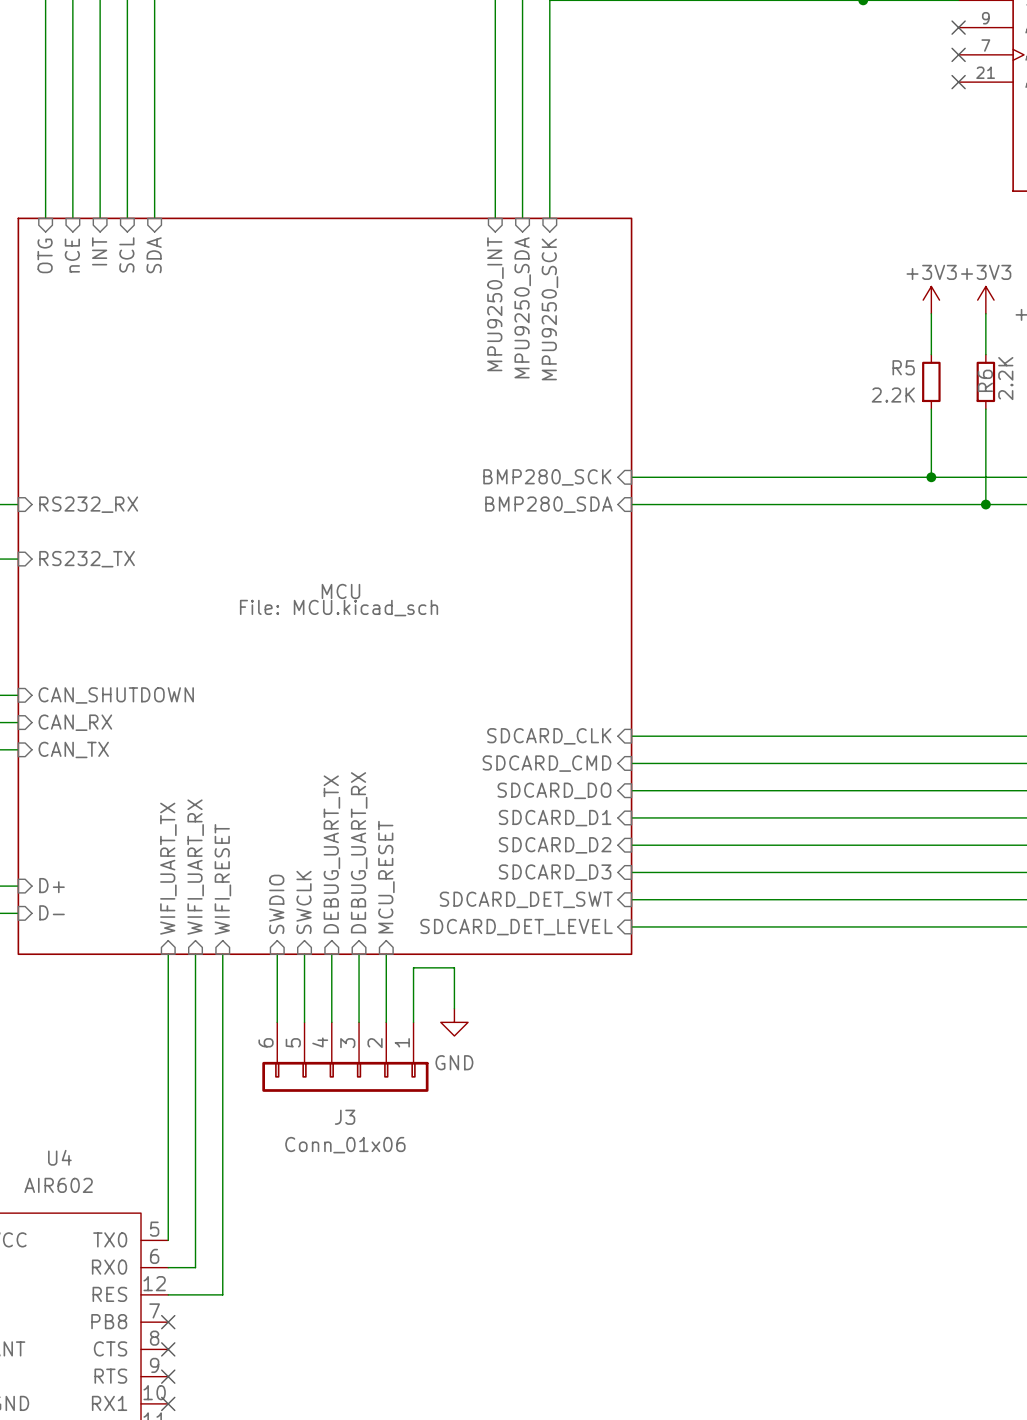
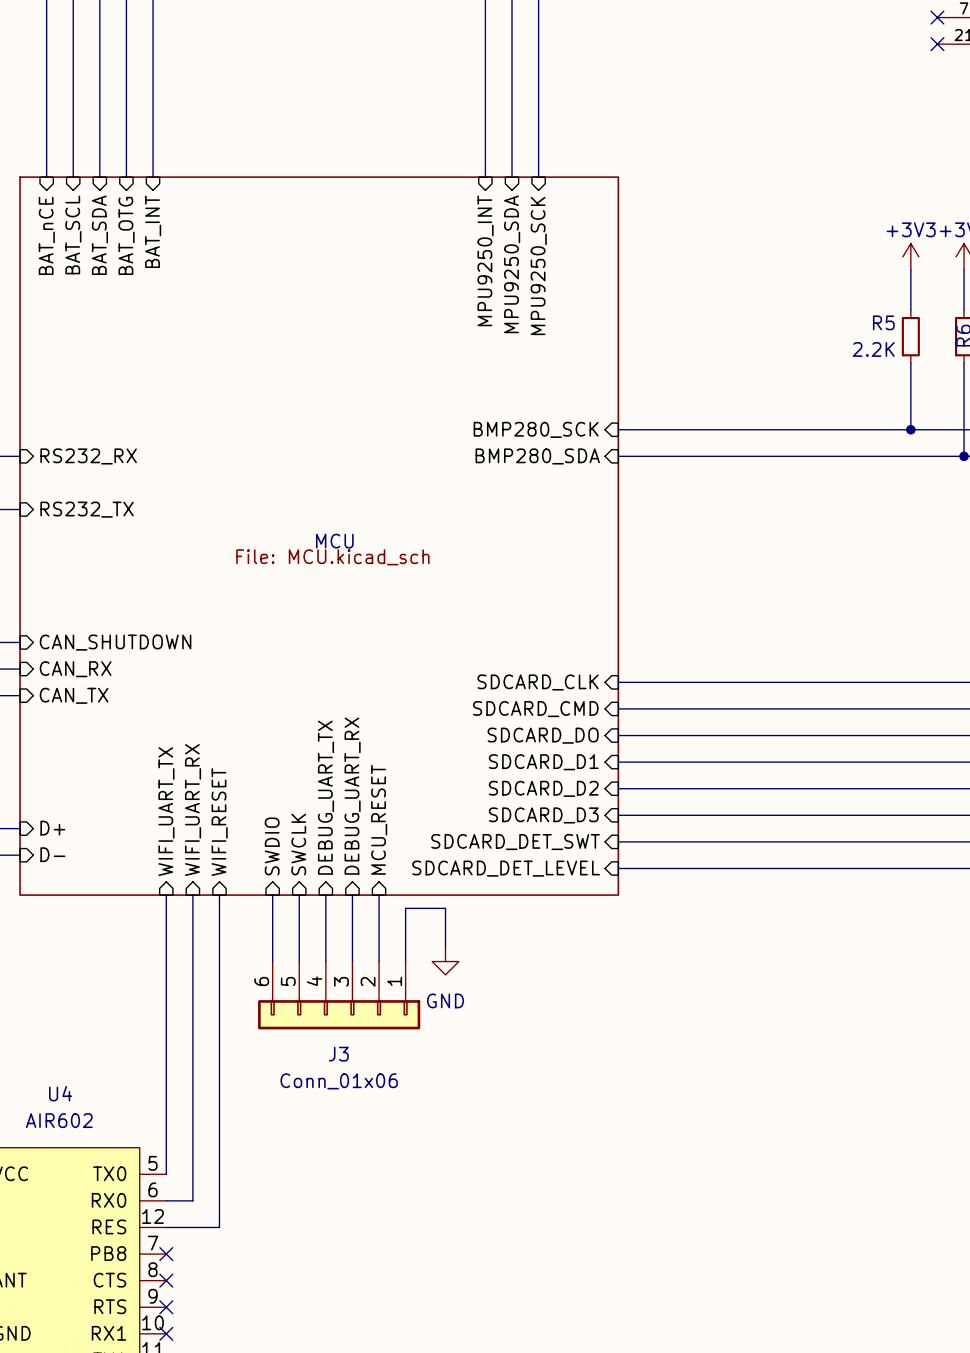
sheet pin: INT (99, 251) -> BAT_SDA (99, 235)
sheet pin: SCL (126, 254) -> BAT_OTG (126, 235)
sheet pin: OTG (45, 255) -> BAT_nCE (46, 235)
sheet pin: nCE (72, 255) -> BAT_SCL (73, 234)
sheet pin: SDA (154, 255) -> BAT_INT (153, 231)

